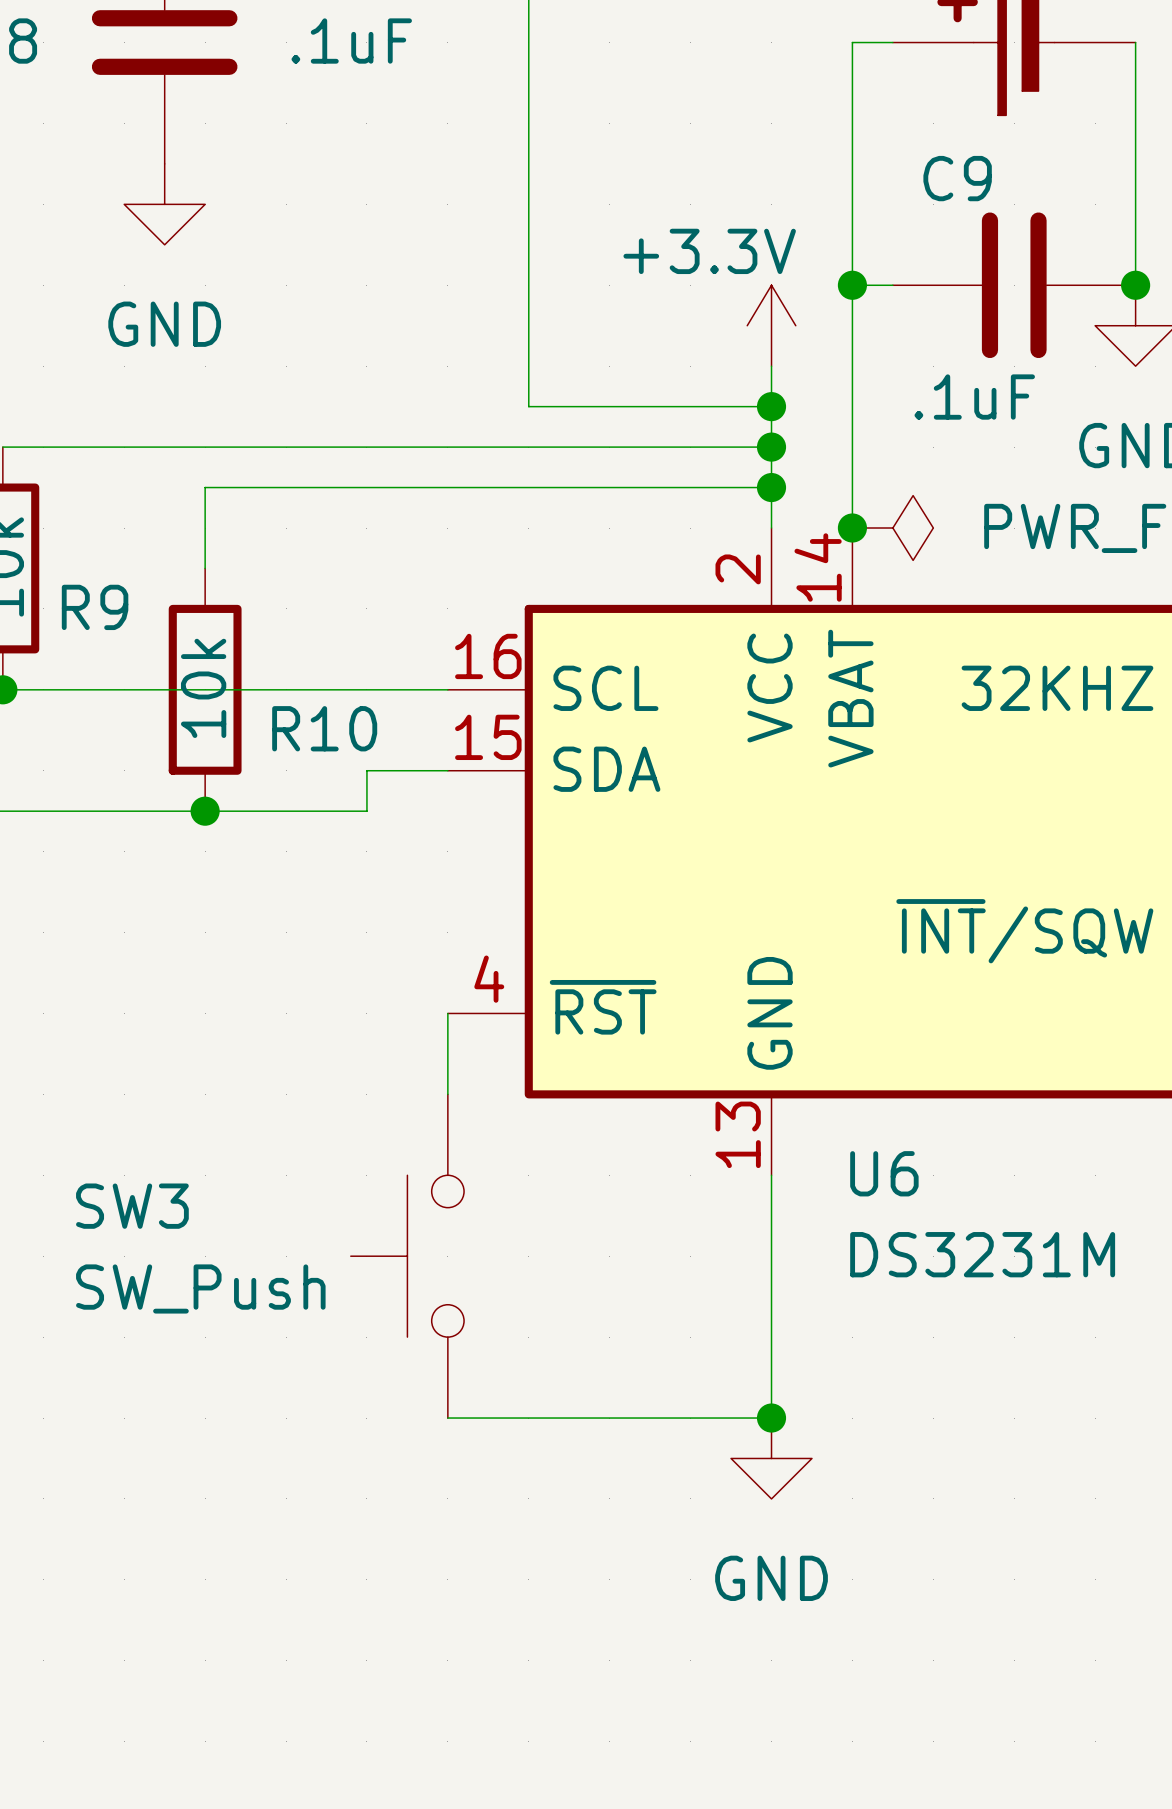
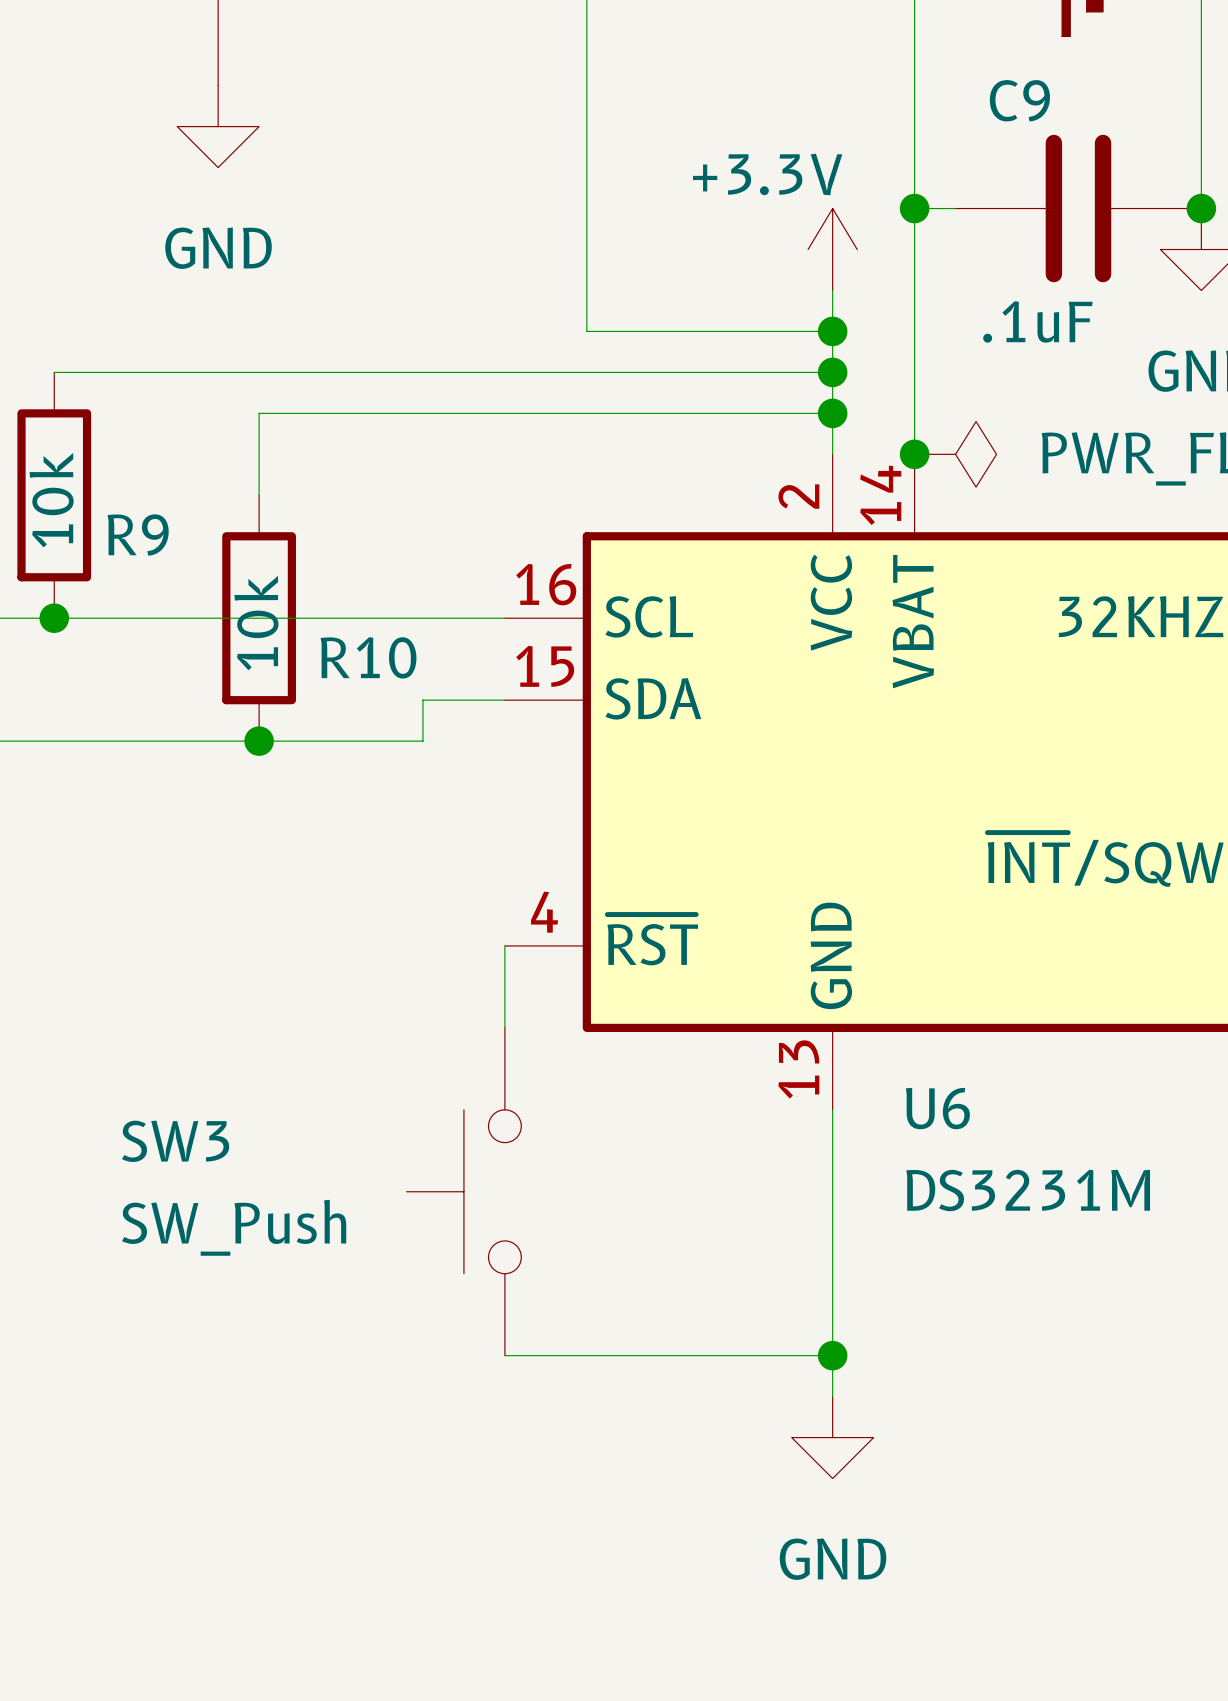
power symbol position: GND (771, 1458) -> GND (832, 1437)

